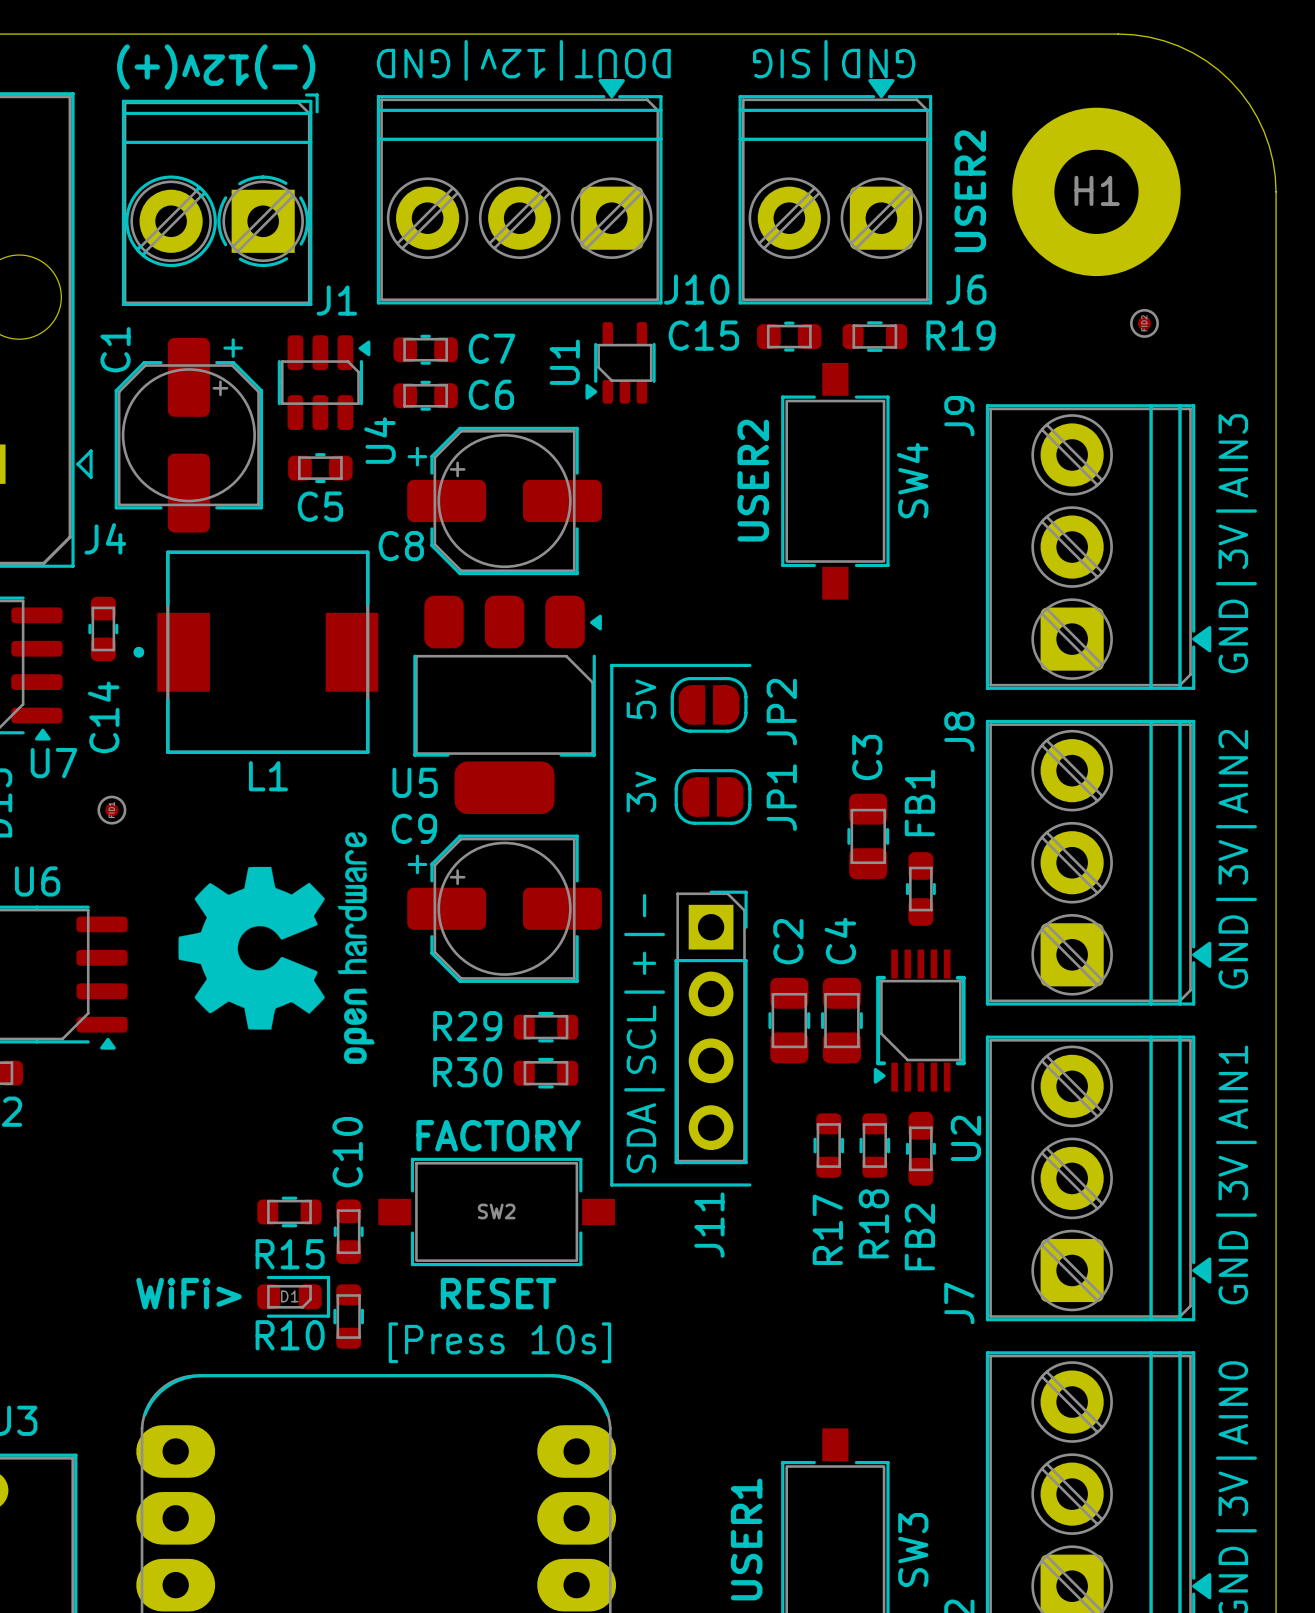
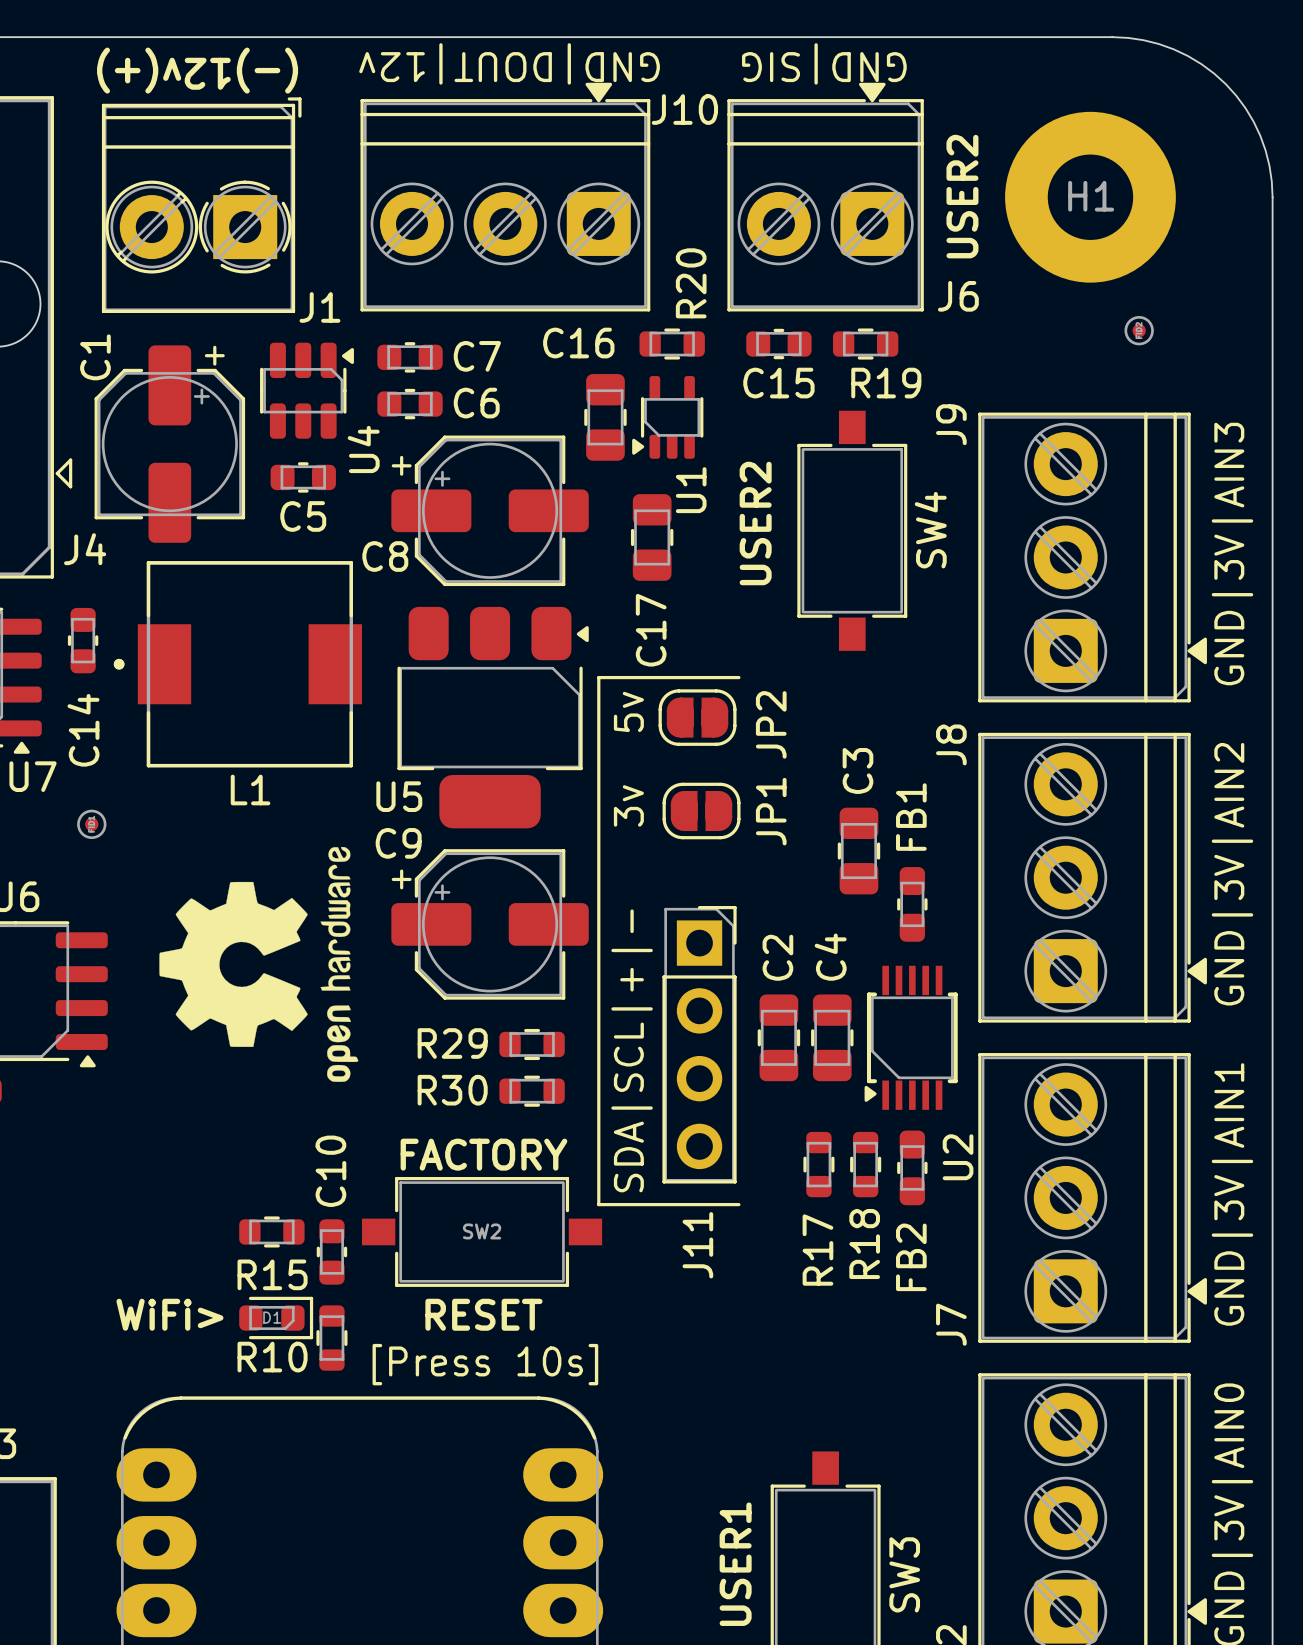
text: DOUT|12v|GND (523, 60) -> GND|DOUT|12v (509, 63)
J10 name position: J10 (696, 289) -> J10 (684, 109)
C15 name position: C15 (703, 335) -> C15 (778, 383)
R19 name position: R19 (960, 335) -> R19 (886, 383)
R20: none -> (672, 344)
U1 name position: U1 (564, 362) -> U1 (691, 490)
U1 position: (620, 362) -> (667, 417)
C16: none -> (605, 417)
text position: USER2 (753, 480) -> USER2 (755, 523)
SW4 position: (835, 481) -> (852, 530)
C17: none -> (652, 537)

